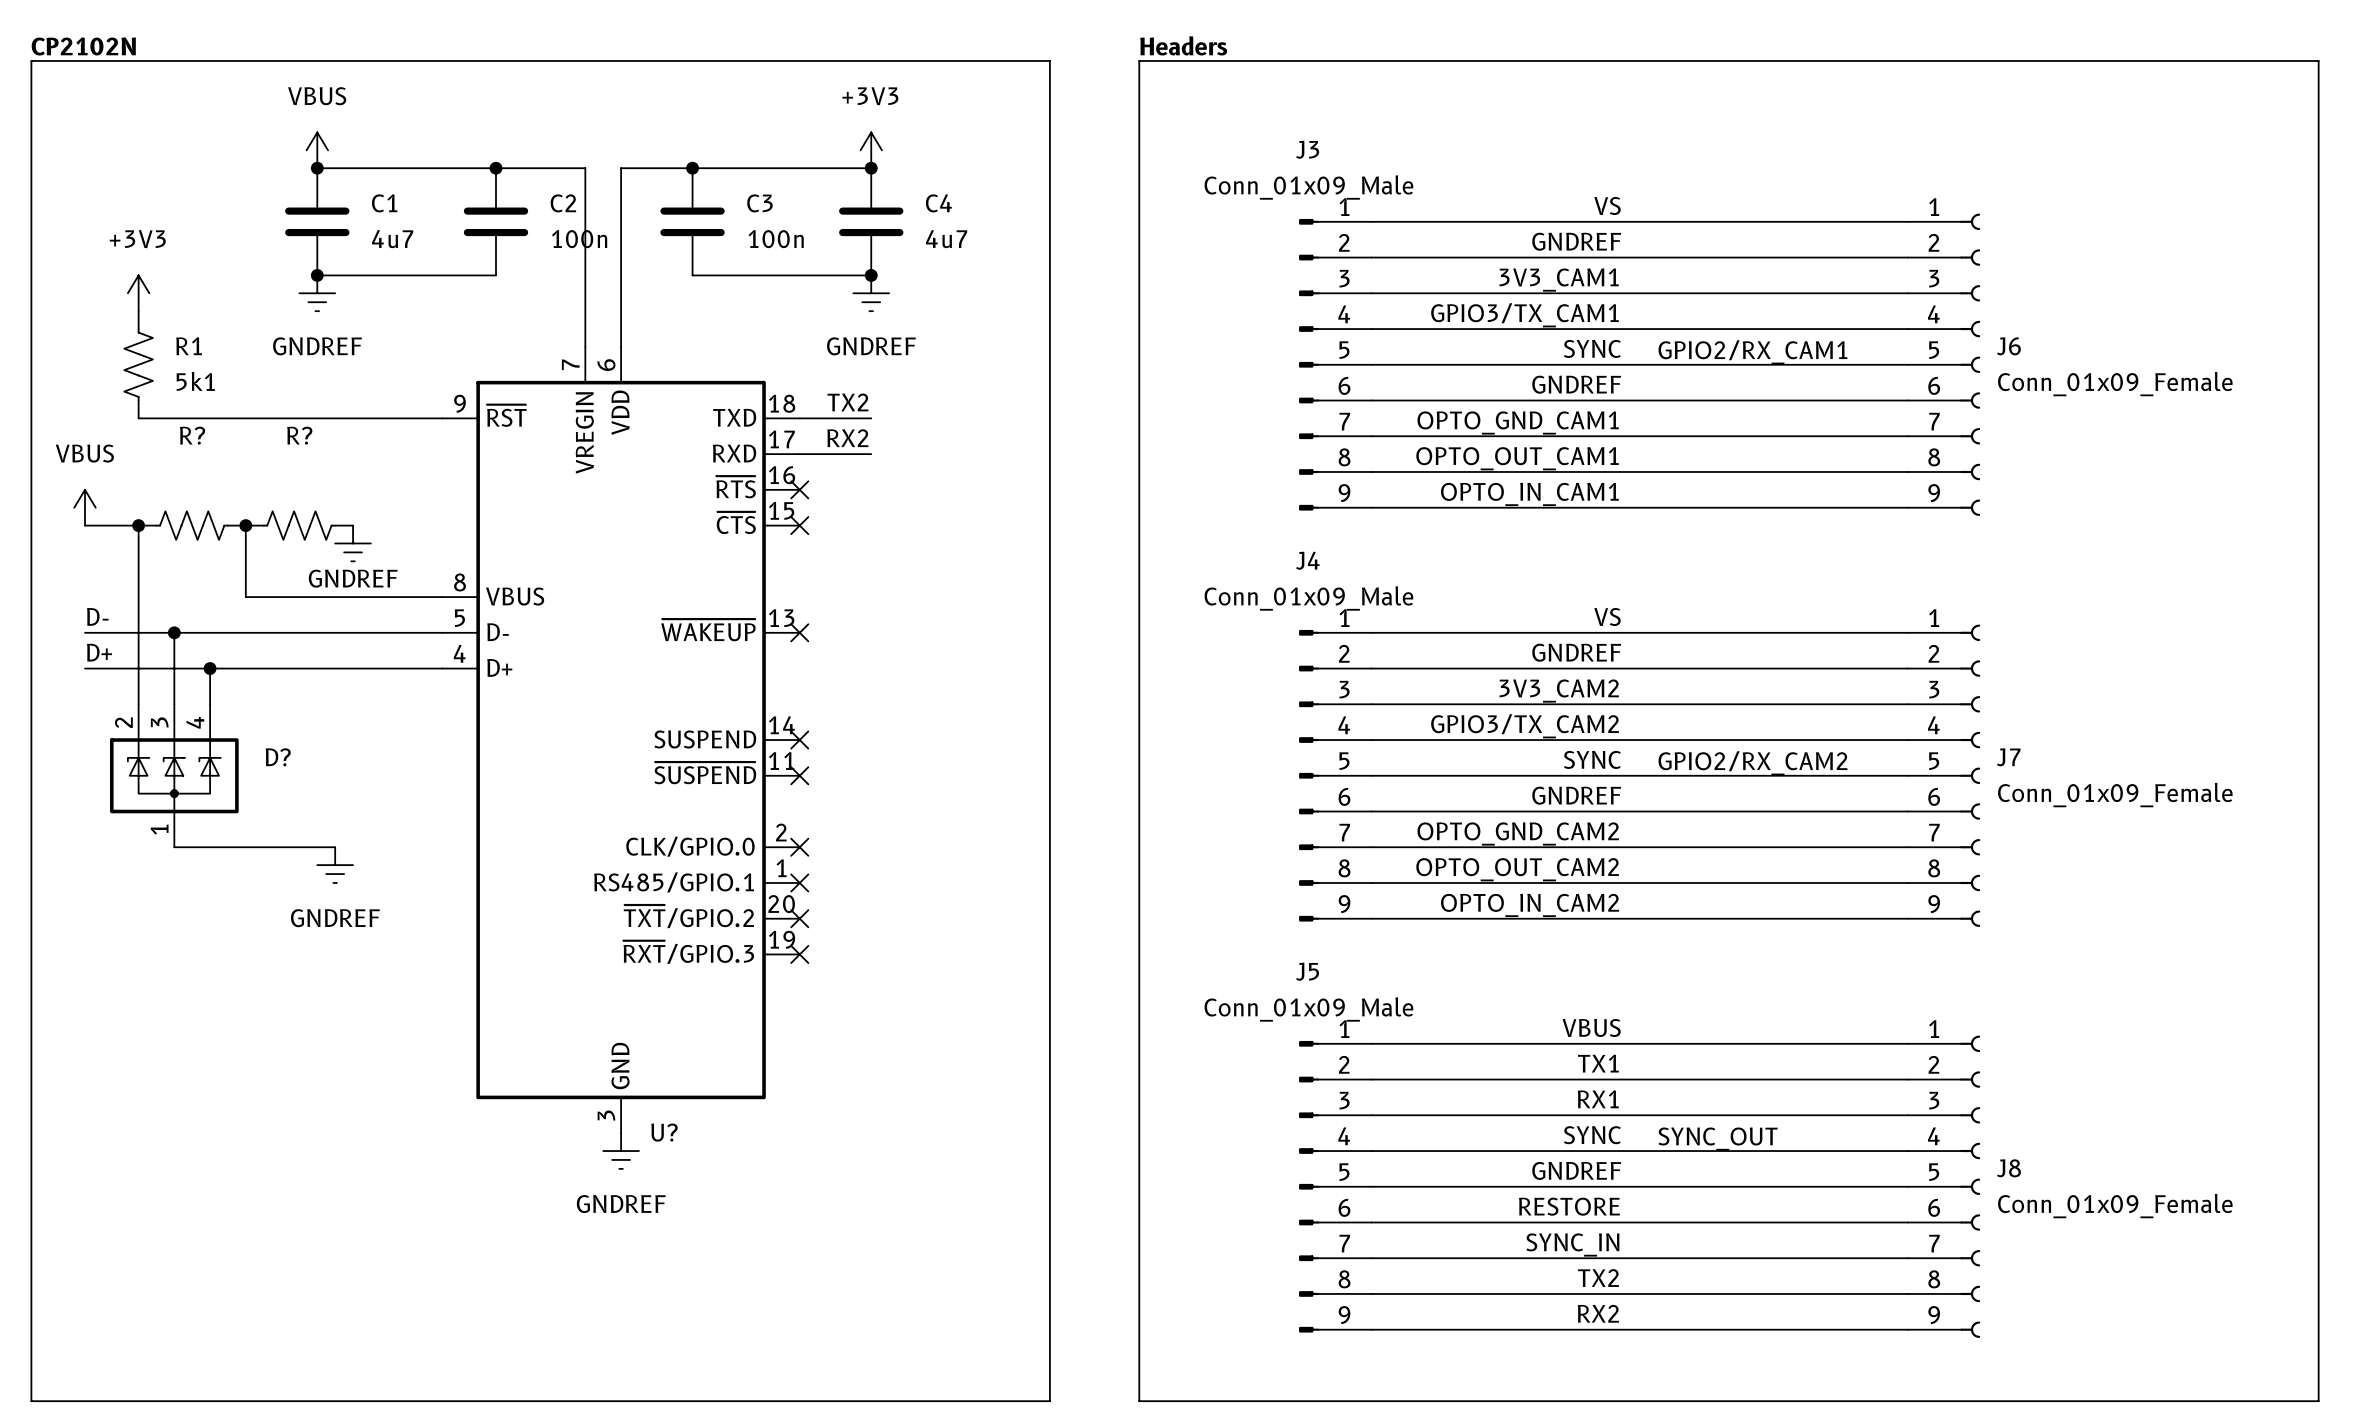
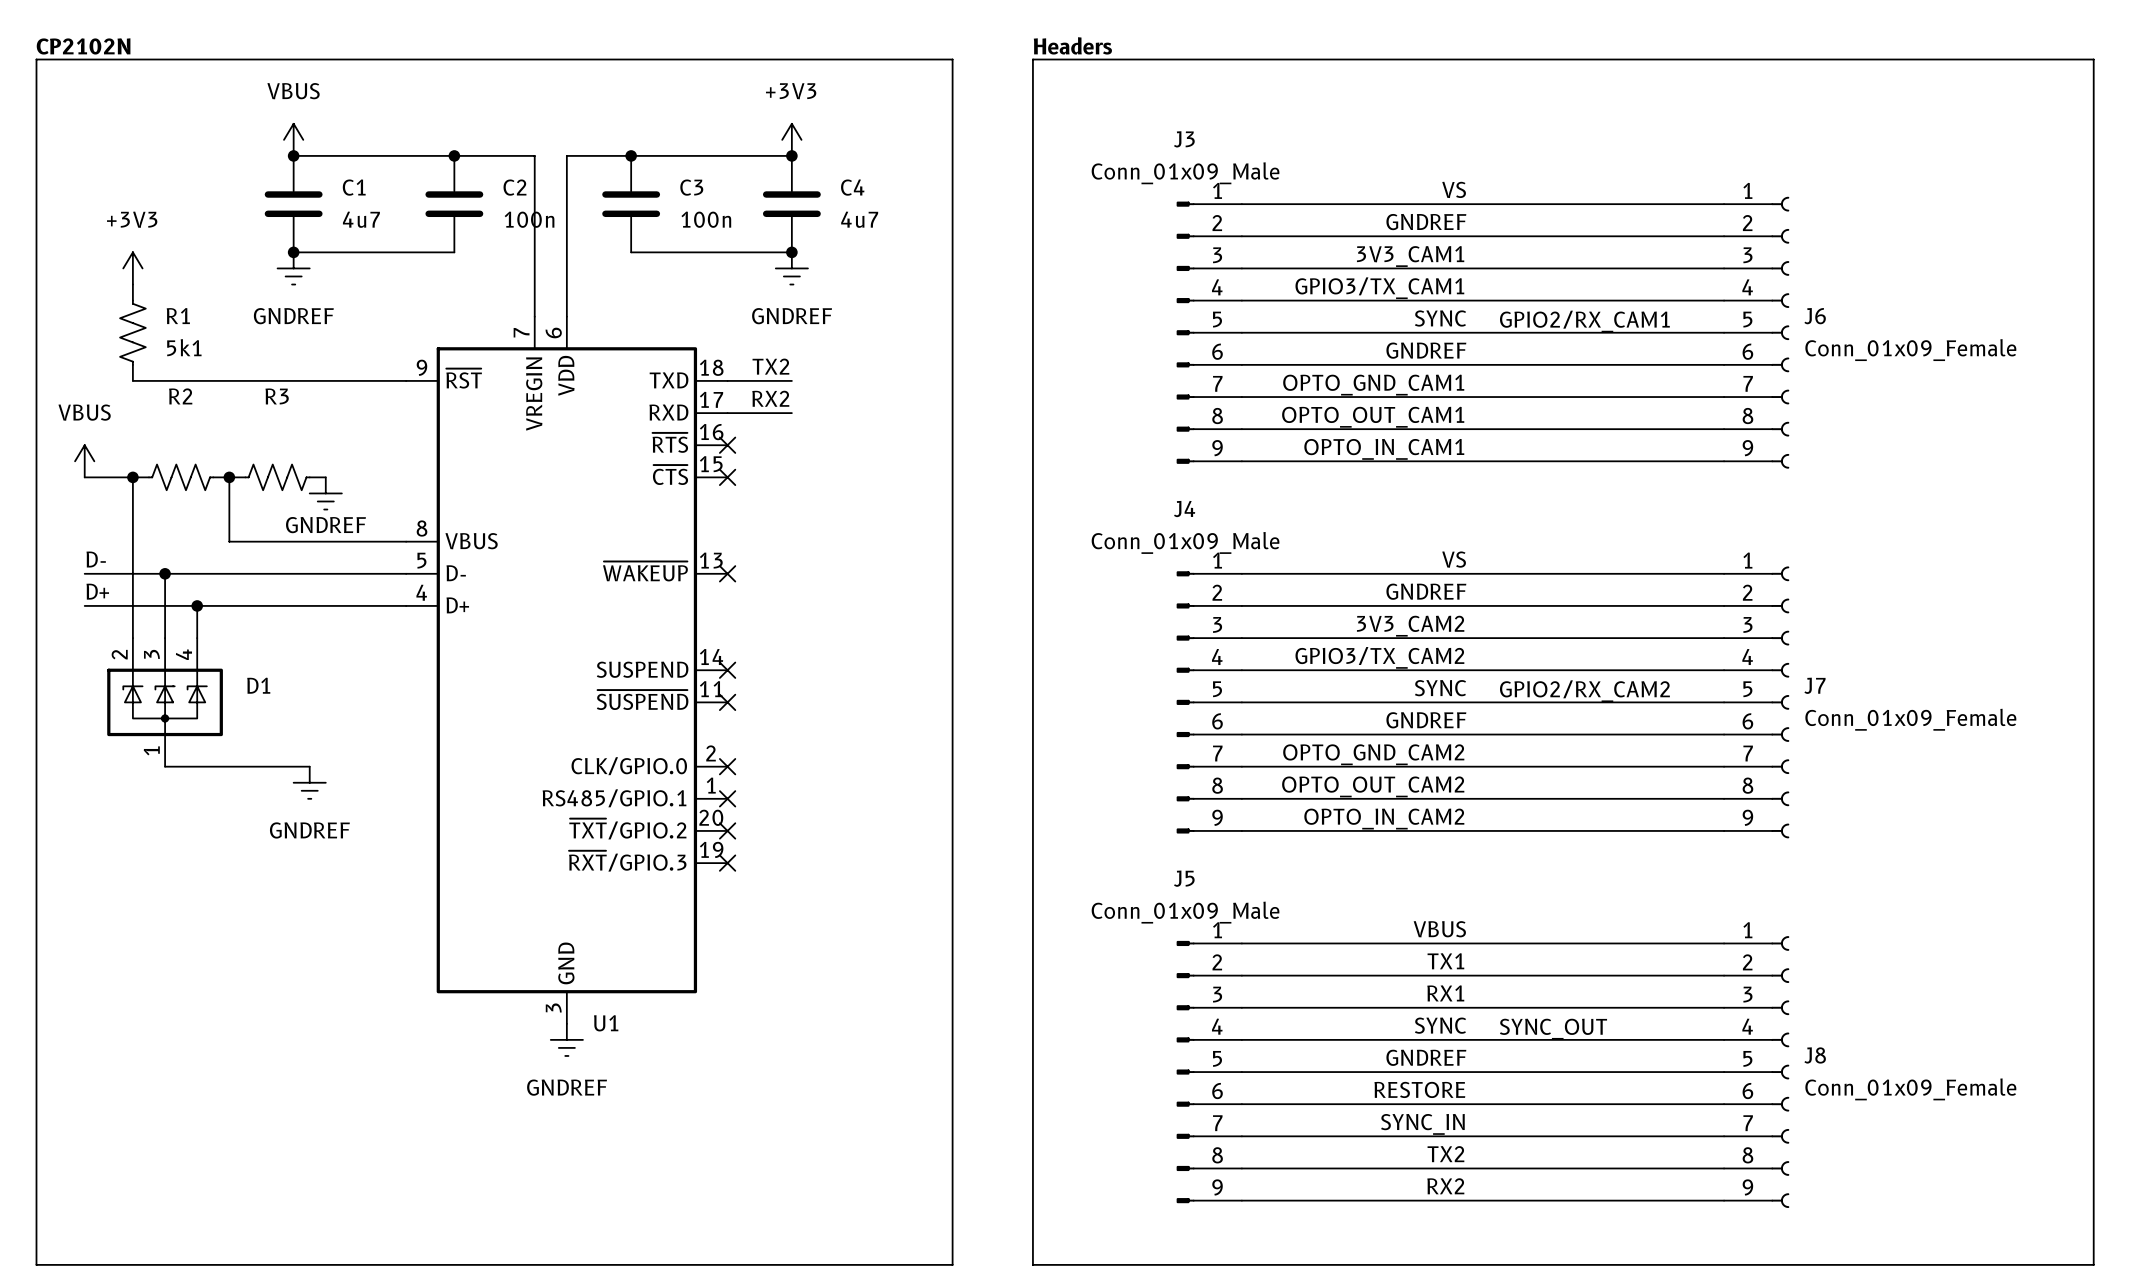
R? name: R? (192, 435) -> R2 (180, 396)
R? name: R? (299, 435) -> R3 (277, 396)
D? name: D? (278, 757) -> D1 (258, 685)
U? name: U? (664, 1132) -> U1 (606, 1023)

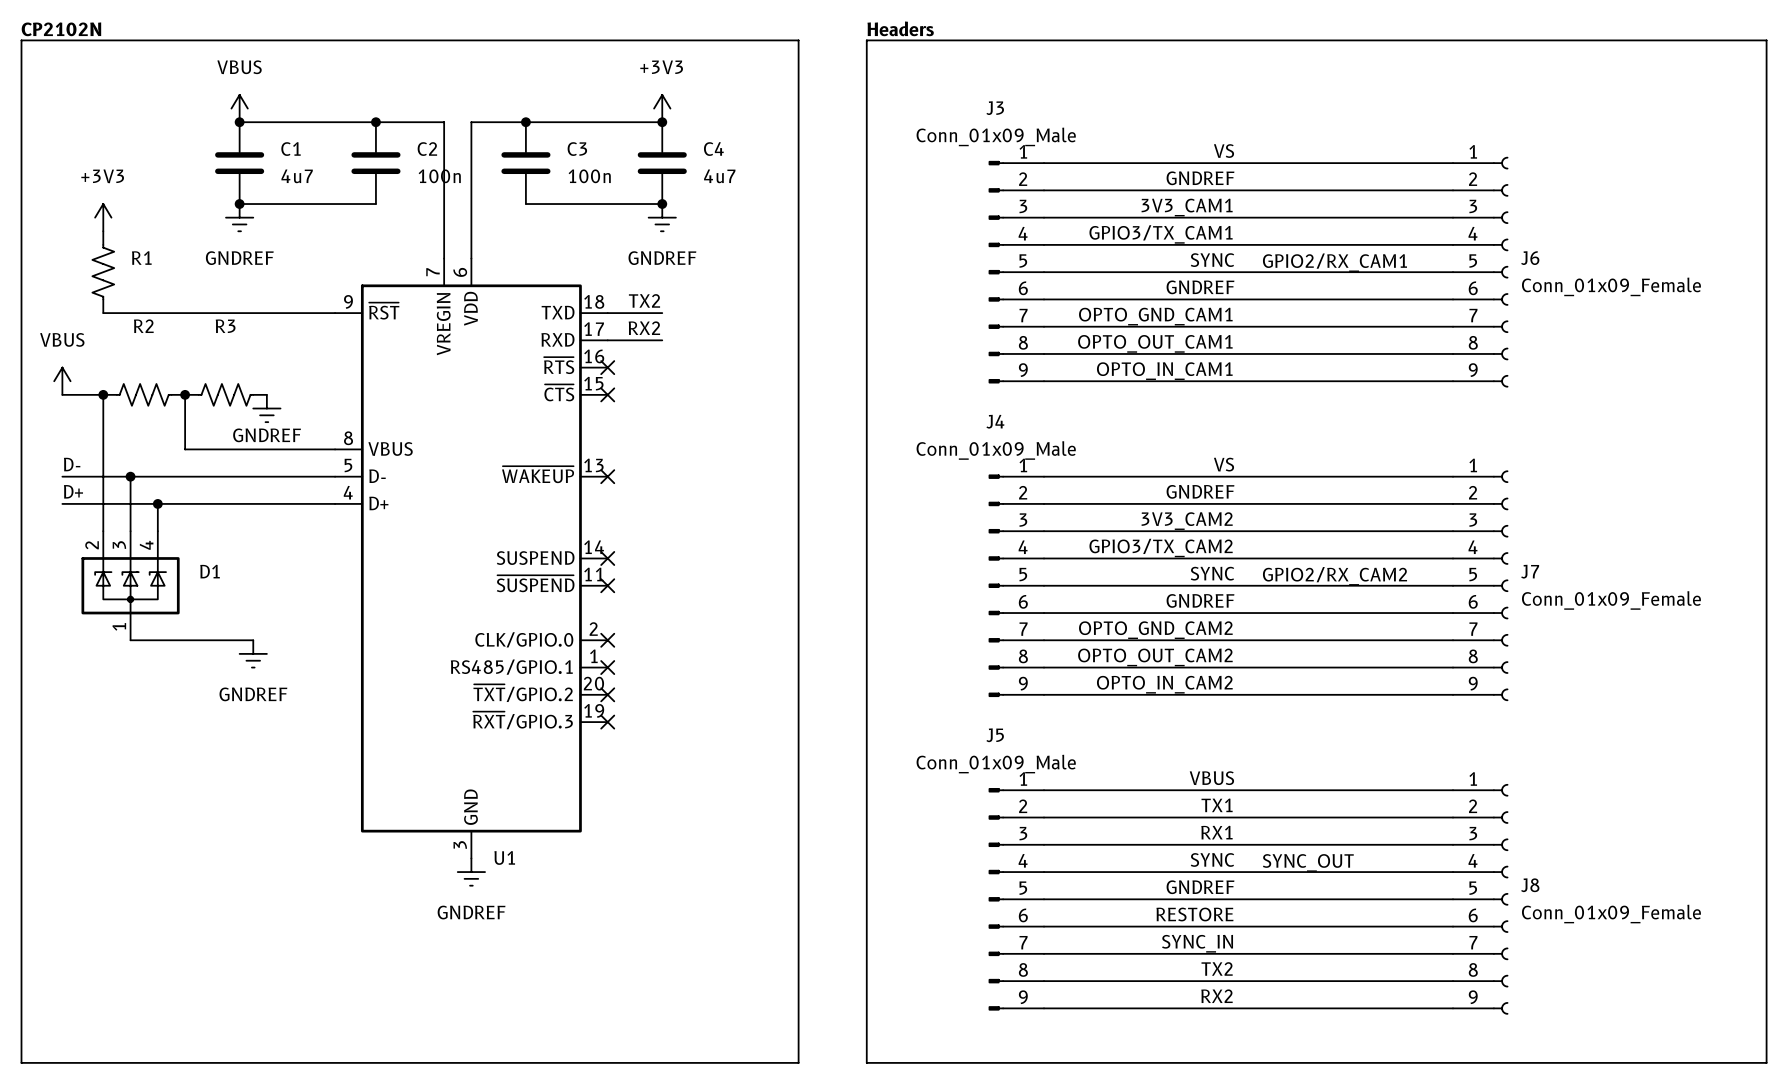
R1 value: 5k1 (184, 347) -> none

